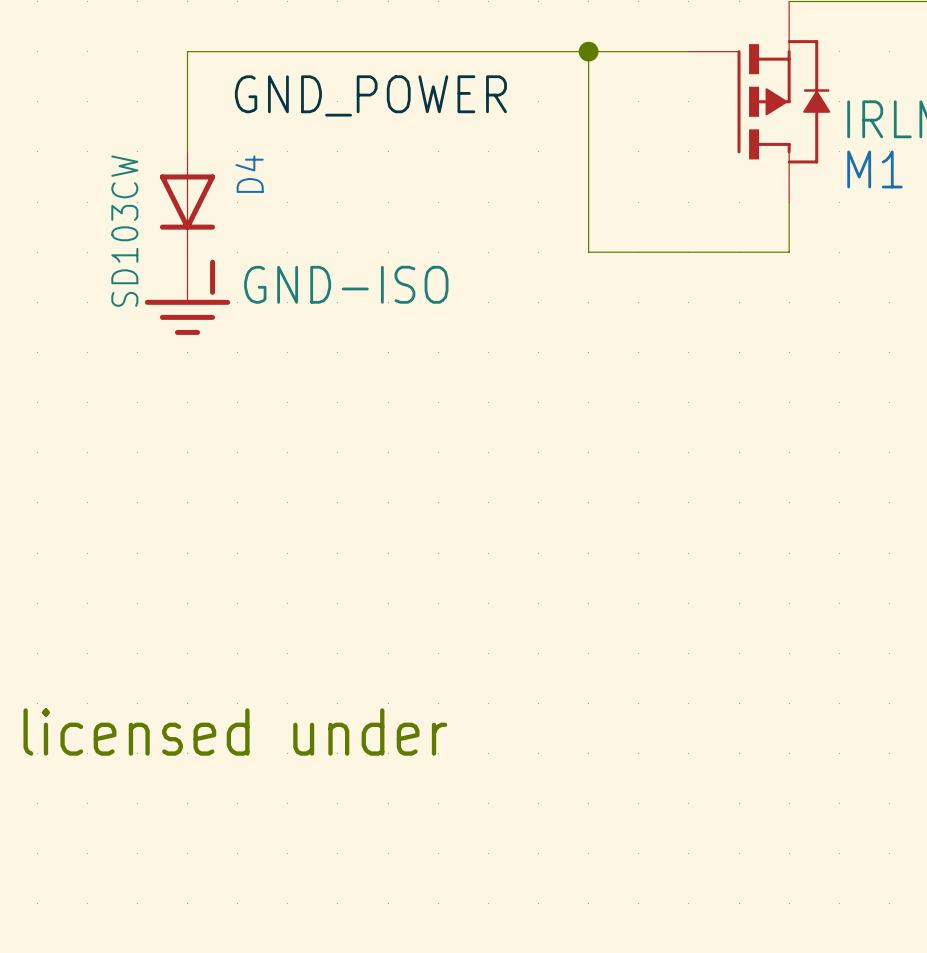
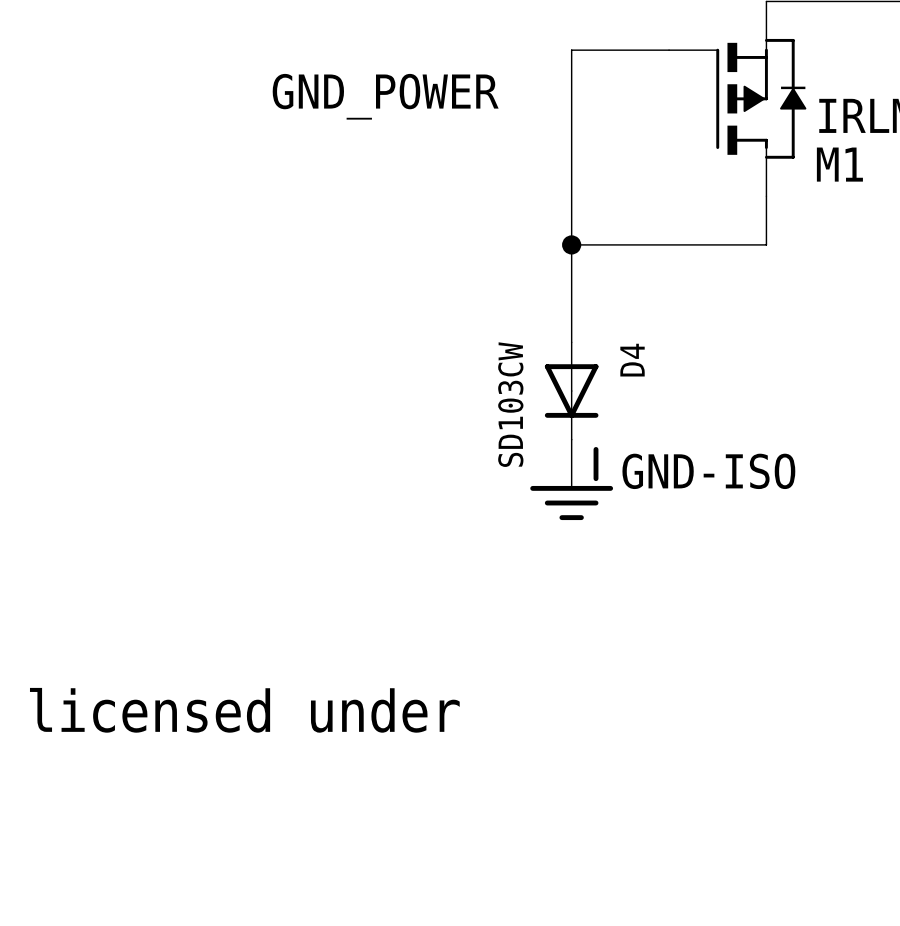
wire: (588, 51) (187, 51) (187, 151) -> none
junction: (588, 51) -> none
D4 position: (187, 202) -> (571, 391)
wire: none -> (571, 244) (571, 342)
junction: none -> (571, 244)
power symbol position: GND-ISO (187, 293) -> GND-ISO (571, 479)

